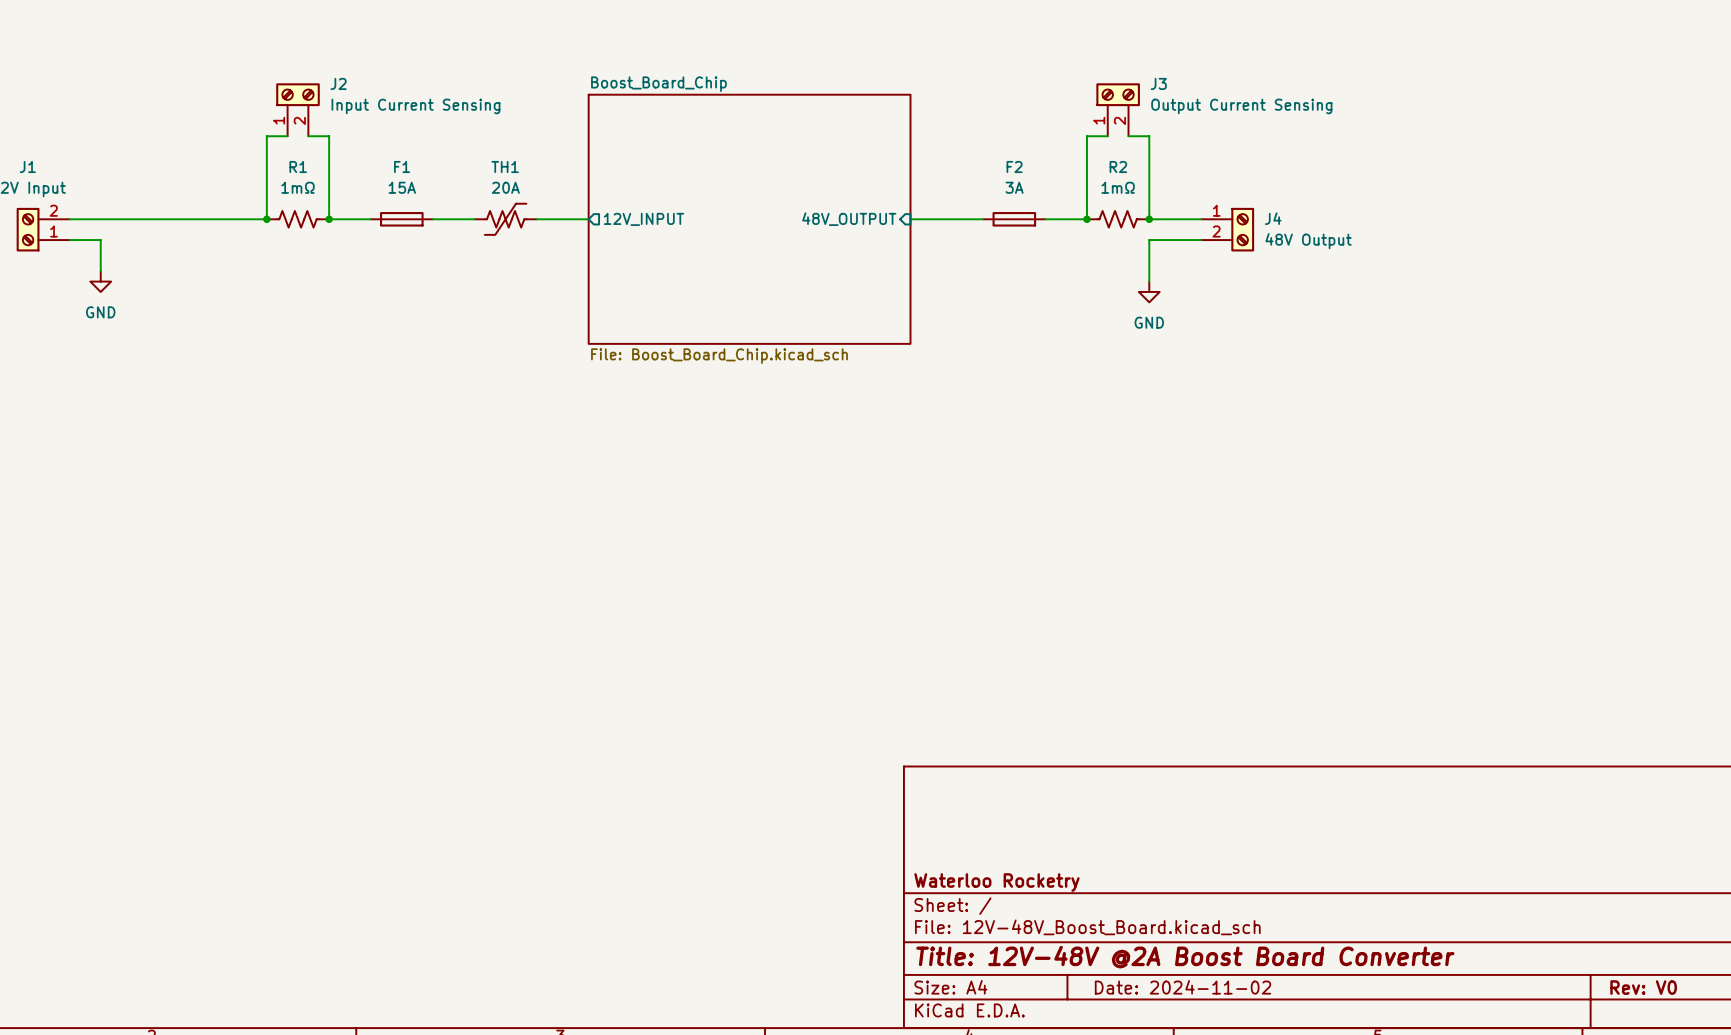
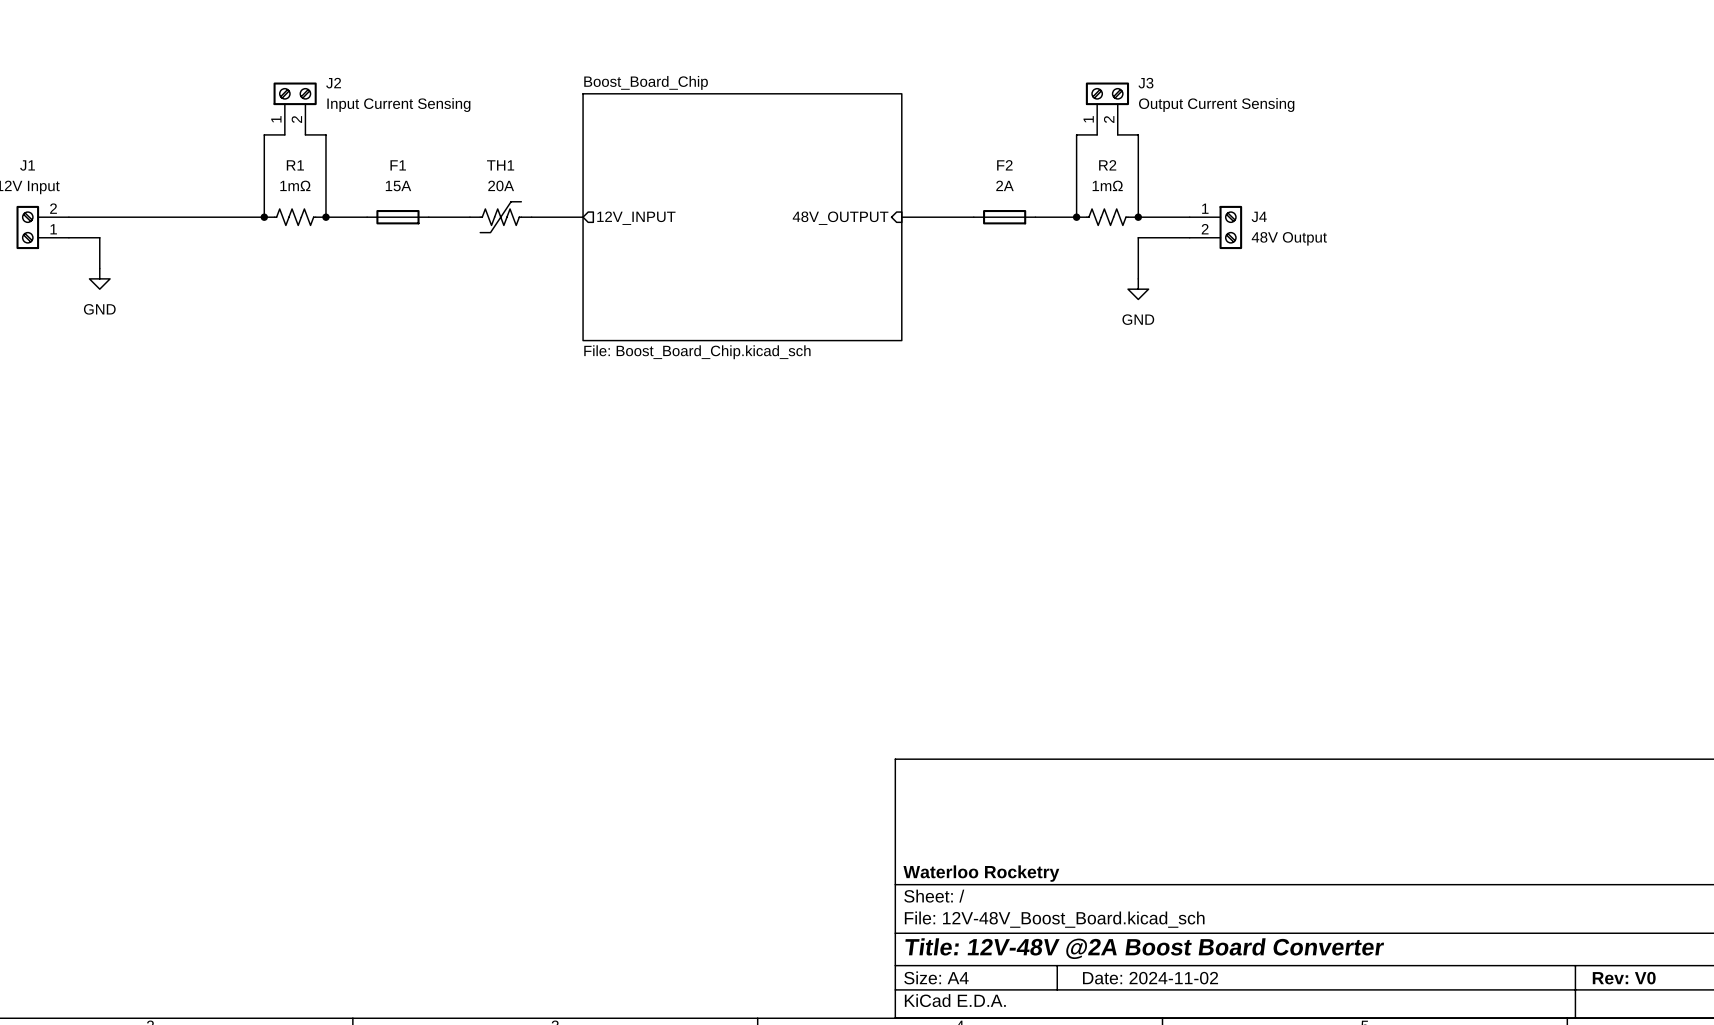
F2 value: 3A (1014, 187) -> 2A (1004, 185)

